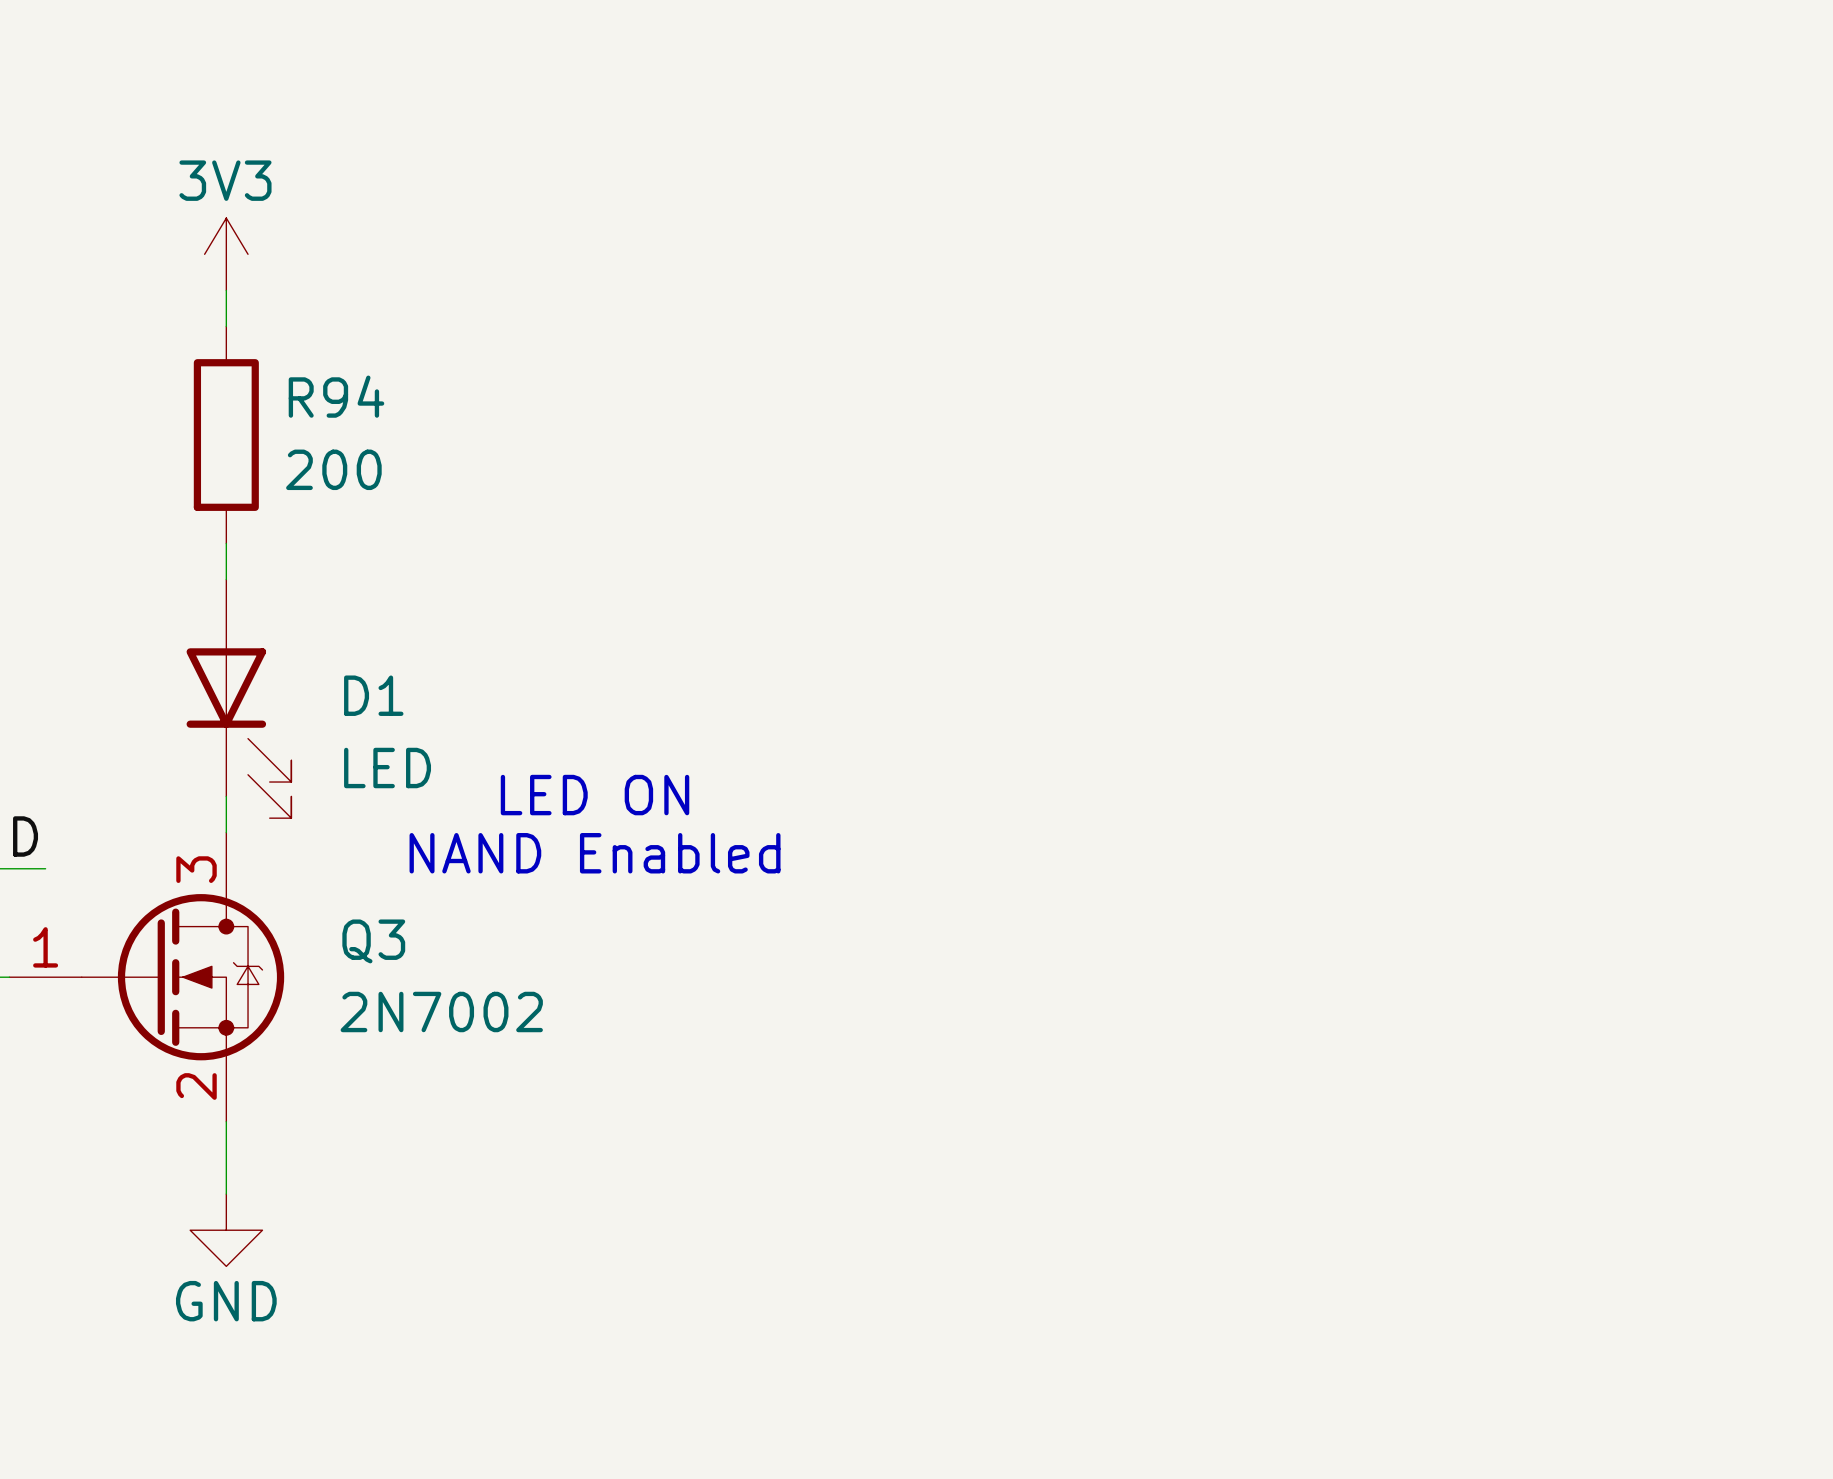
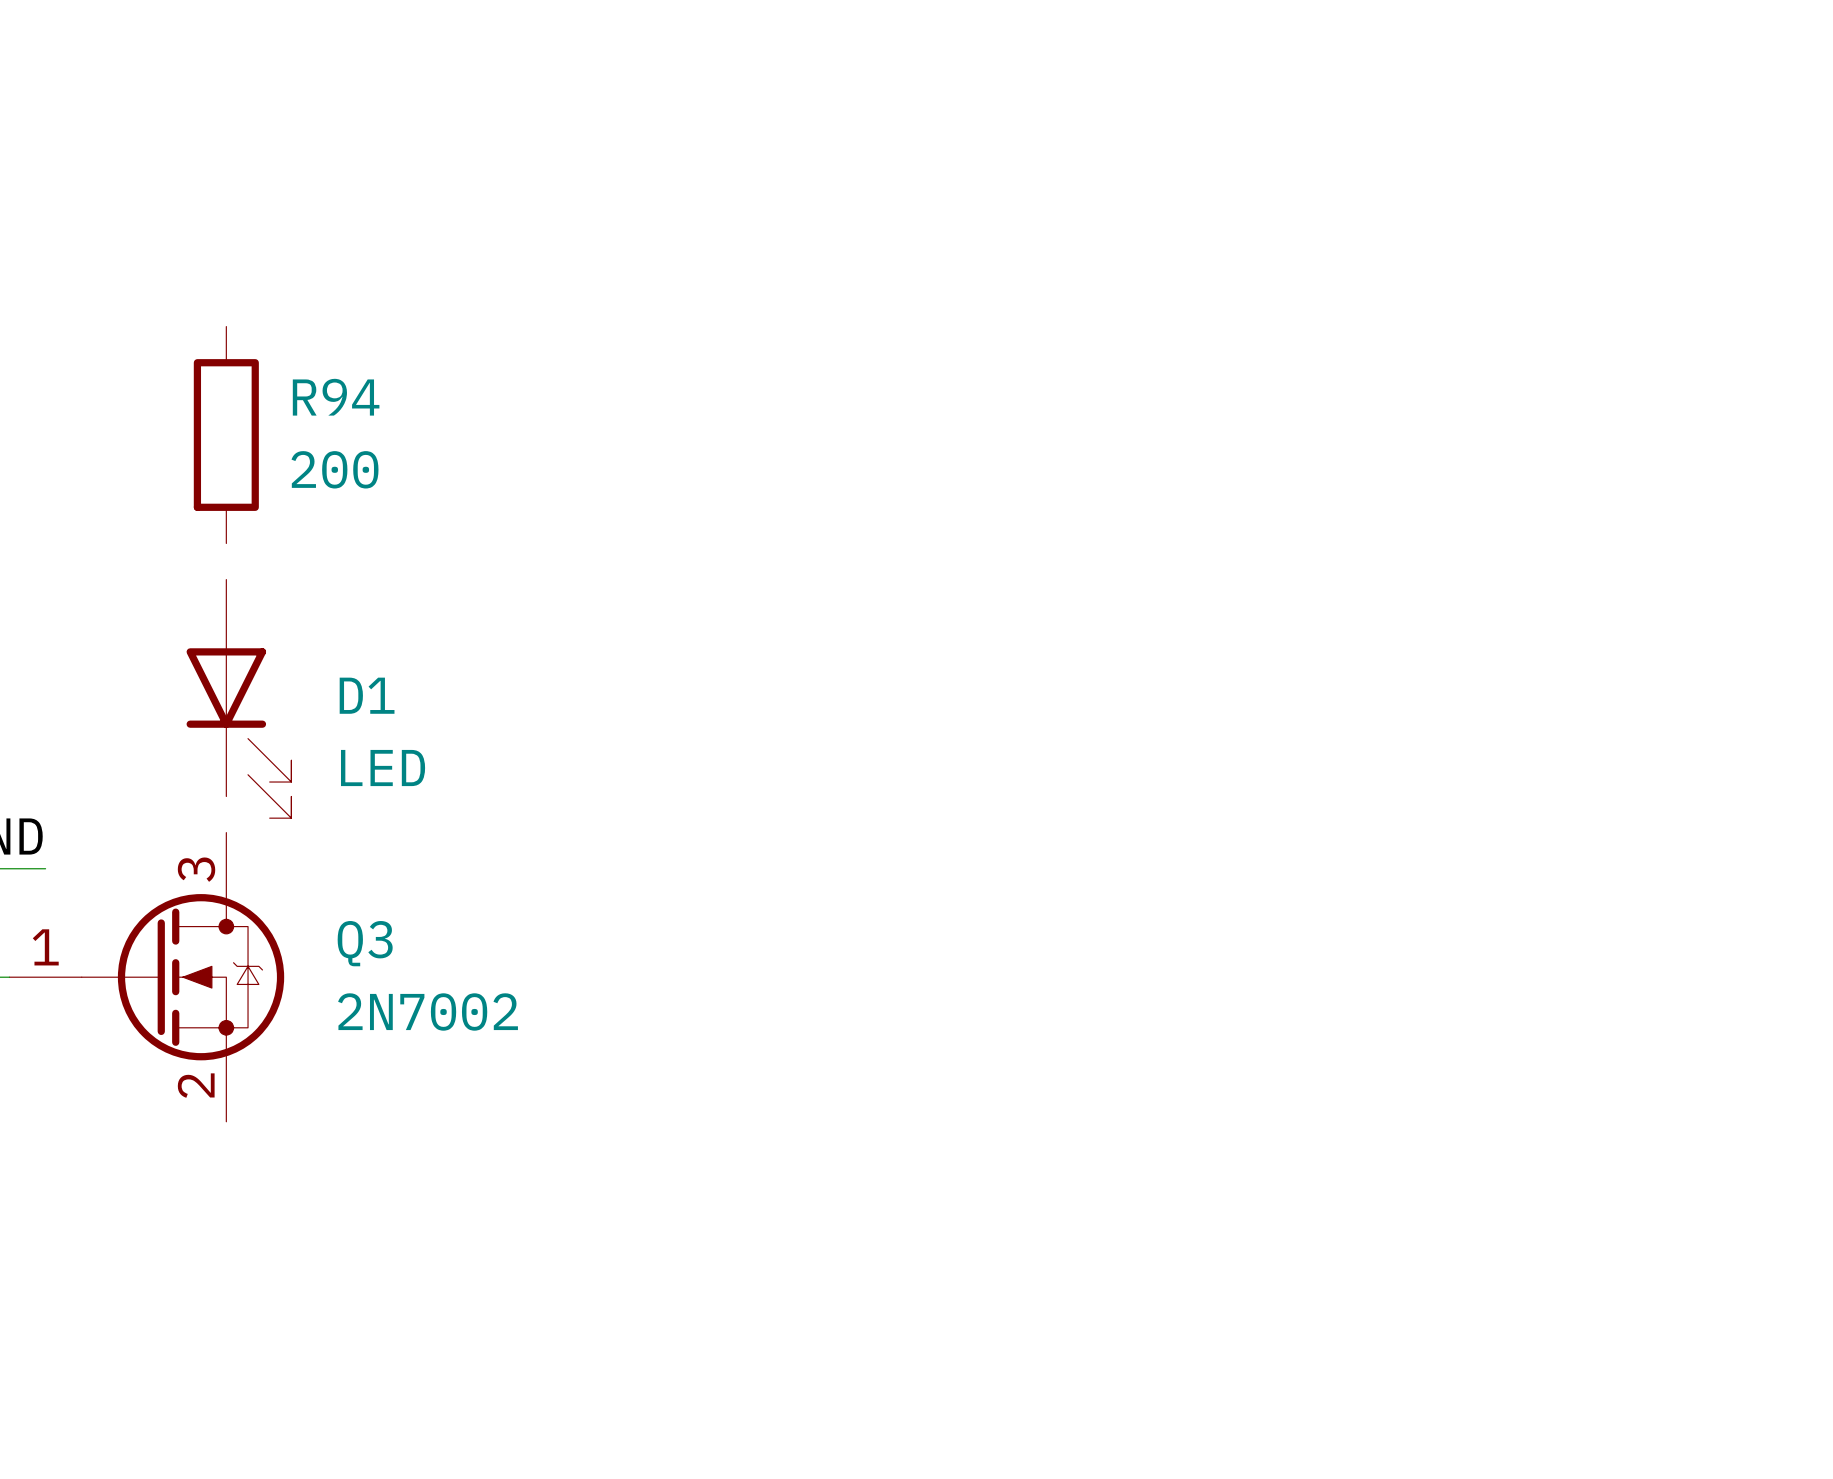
power symbol: 3V3 (226, 254) -> none
wire: (226, 290) (226, 326) -> none
wire: (226, 543) (226, 579) -> none
text: LED ON (595, 795) -> none
wire: (226, 796) (226, 832) -> none
text: NAND Enabled (595, 853) -> none
wire: (226, 1121) (226, 1194) -> none
power symbol: GND (226, 1230) -> none

